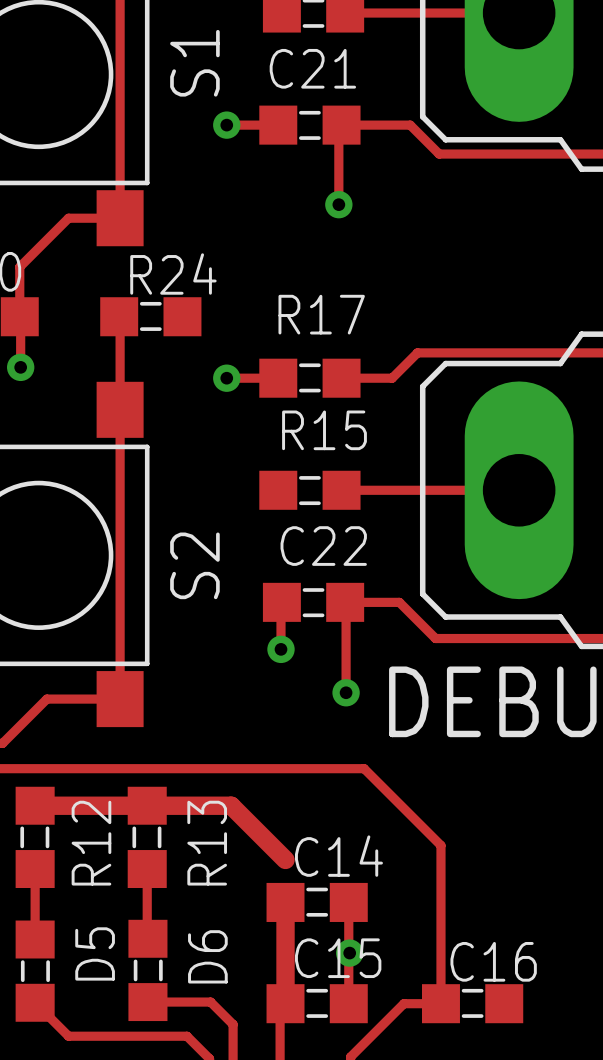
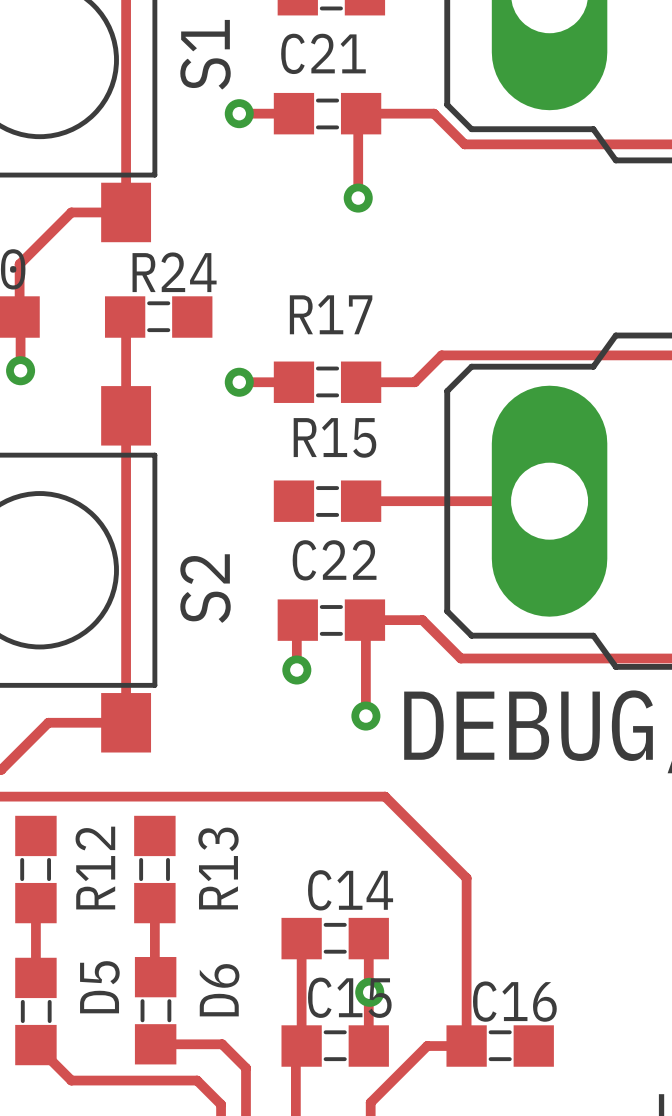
track: (35, 805) (231, 805) (285, 859) -> none
track width: thick (285, 902) (285, 1003) -> thin (301, 938) (301, 1046)

